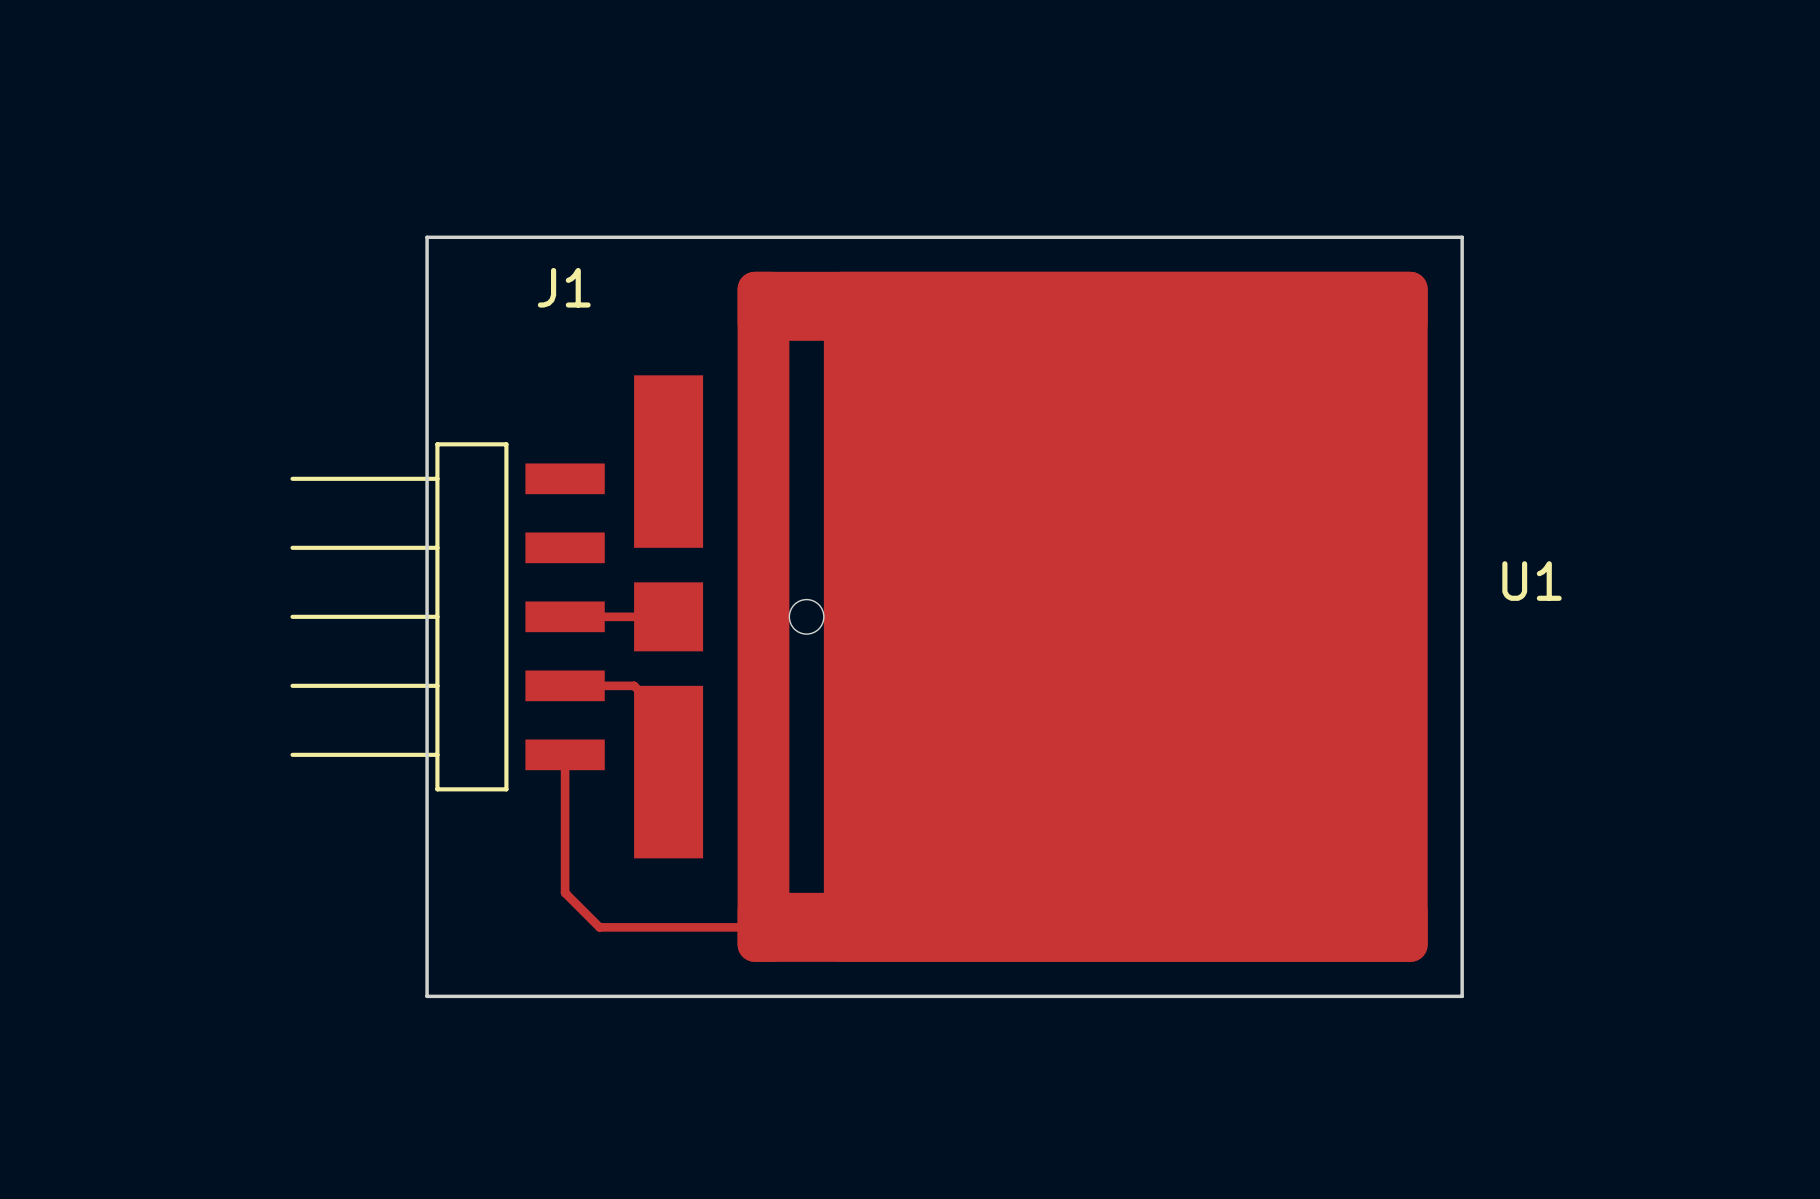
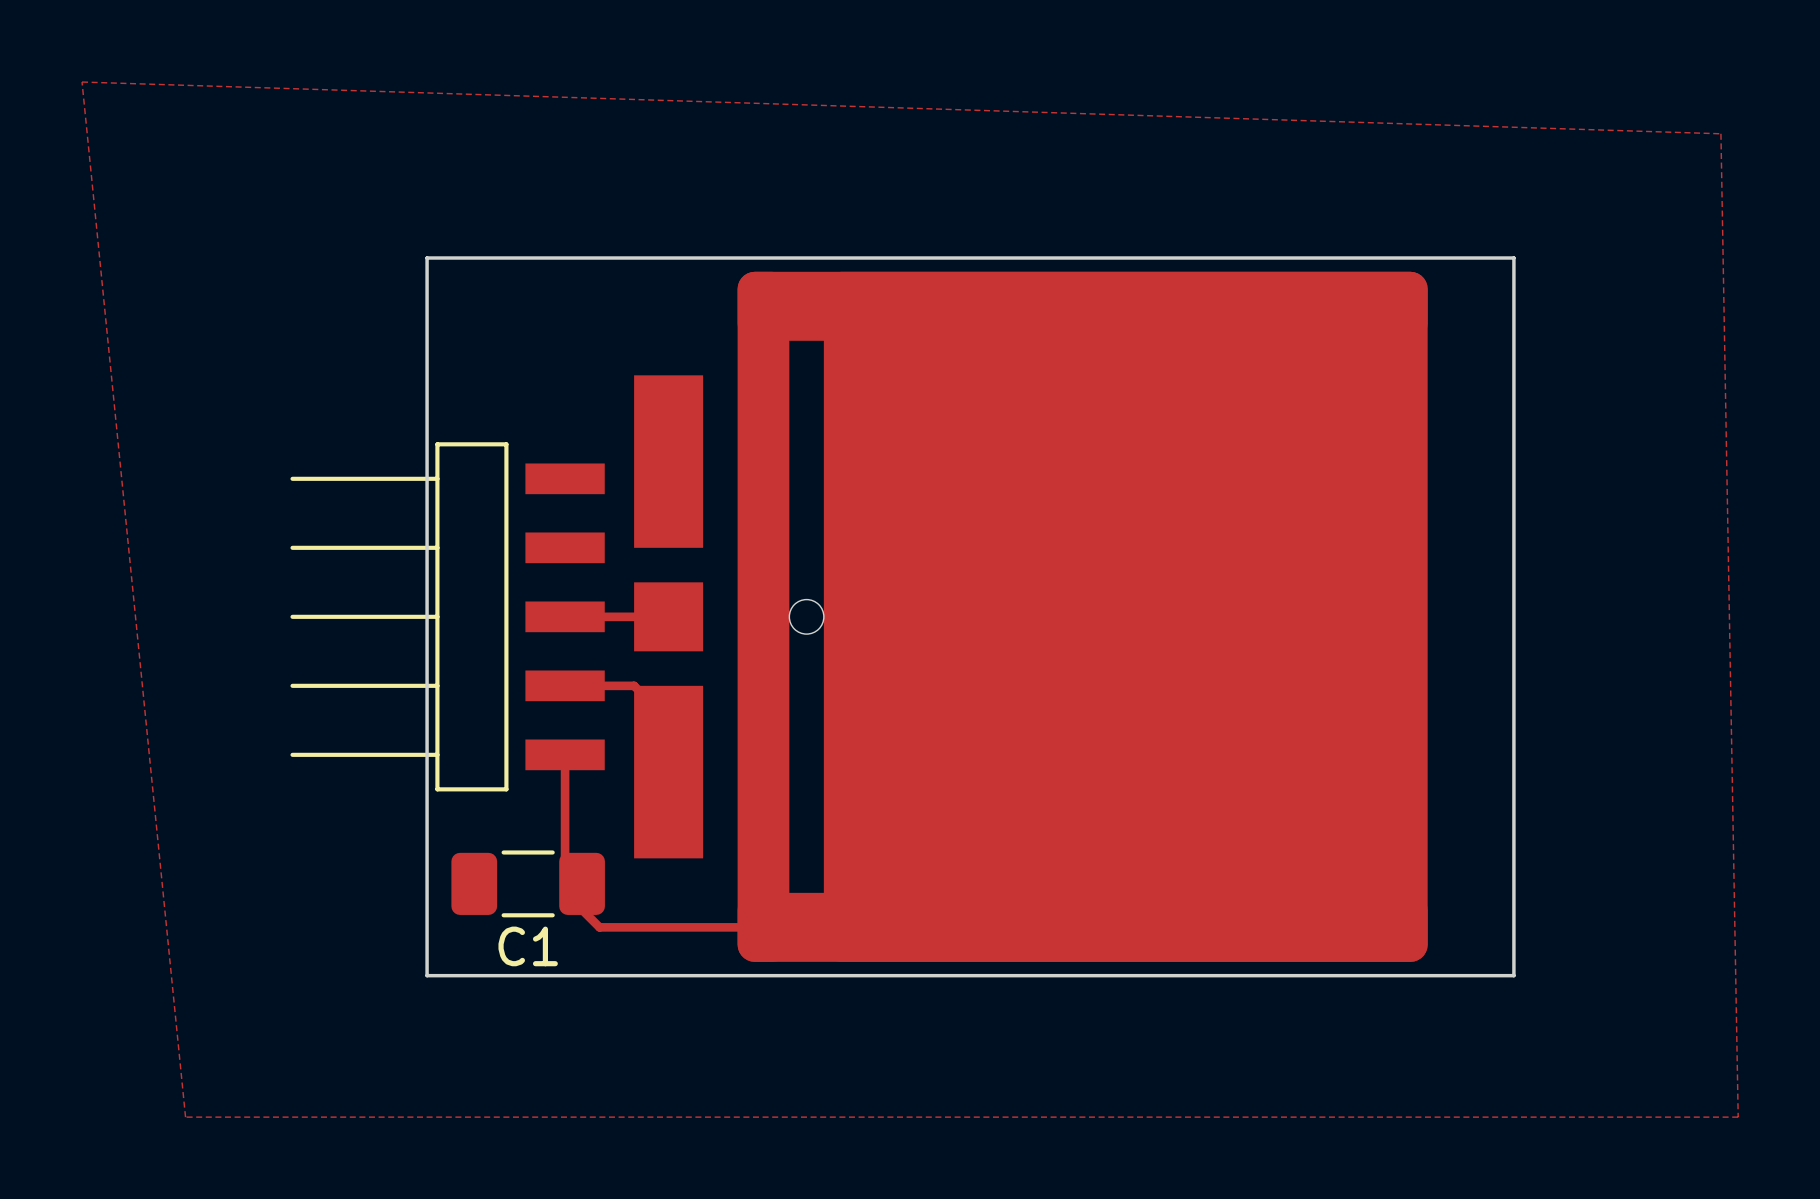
zone outline: none -> (82, 82) (185, 1117) (1738, 1117) (1720, 133) (82, 82)
board edge: (427, 258) (427, 237) (1462, 237) (1462, 996) (427, 996) (427, 975) -> (427, 258) (1513, 258) (1513, 975) (427, 975)
J1 name: J1 (564, 287) -> none
U1 name: U1 (1531, 581) -> none
C1: none -> (528, 883)

